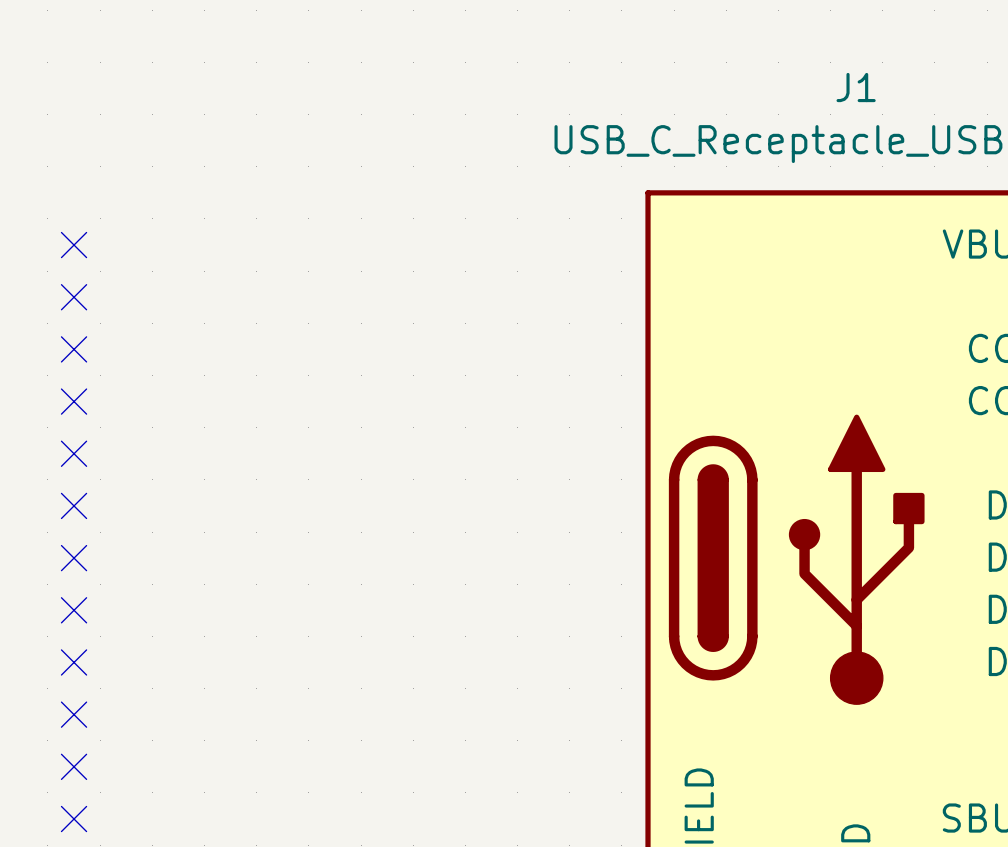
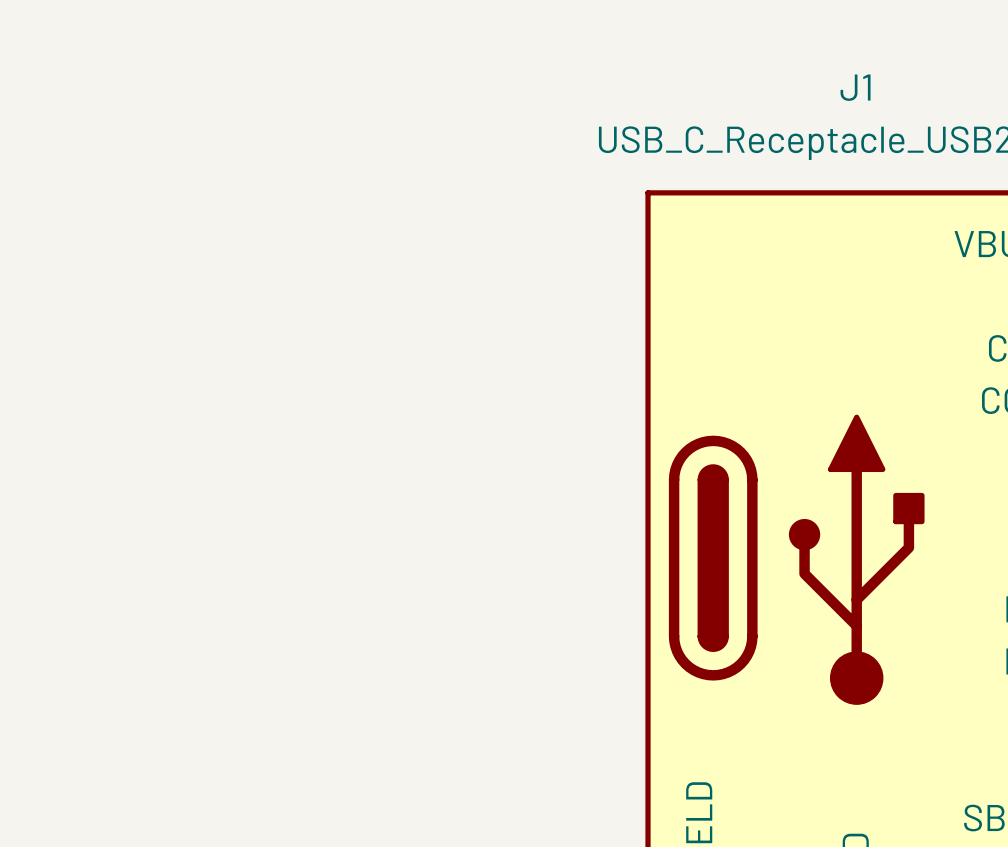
no-connect mark: (74, 245) -> none
no-connect mark: (74, 297) -> none
no-connect mark: (74, 349) -> none
no-connect mark: (74, 401) -> none
no-connect mark: (74, 453) -> none
no-connect mark: (74, 505) -> none
no-connect mark: (74, 558) -> none
no-connect mark: (74, 610) -> none
no-connect mark: (74, 662) -> none
no-connect mark: (74, 714) -> none
no-connect mark: (74, 766) -> none
no-connect mark: (74, 819) -> none

